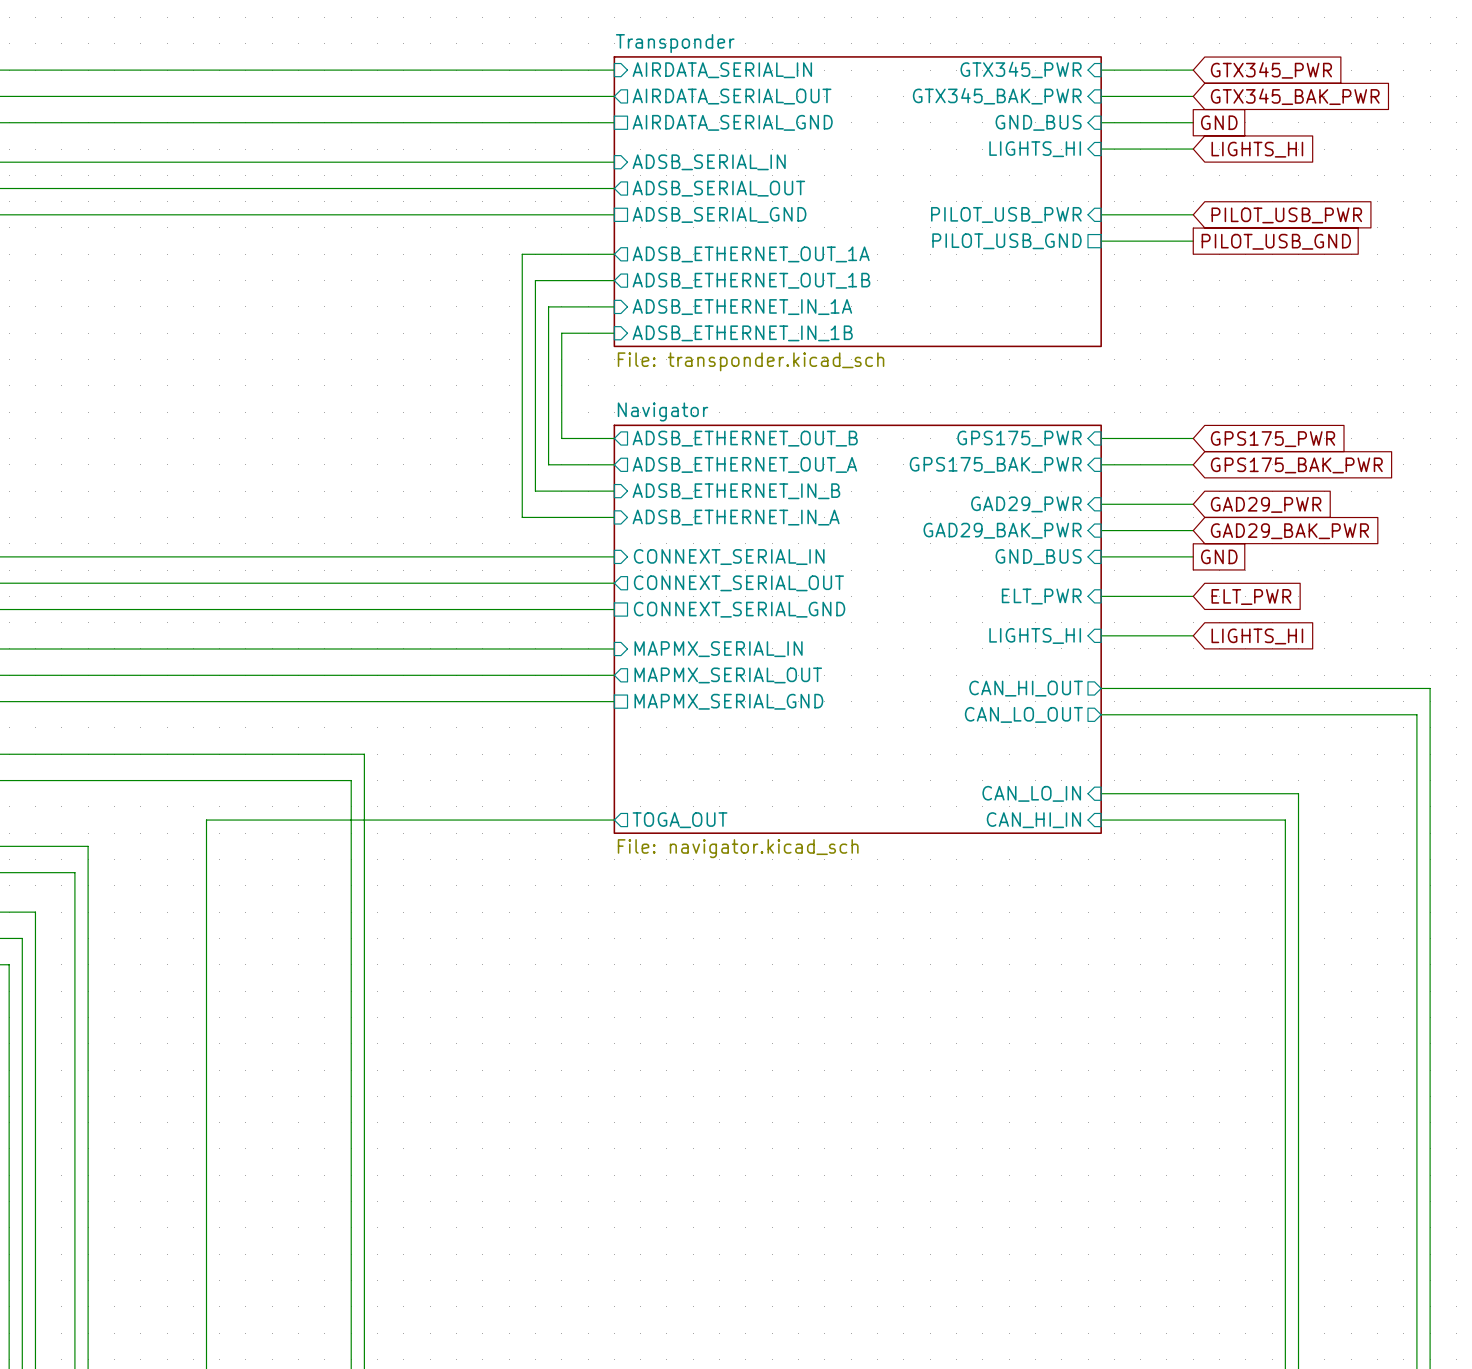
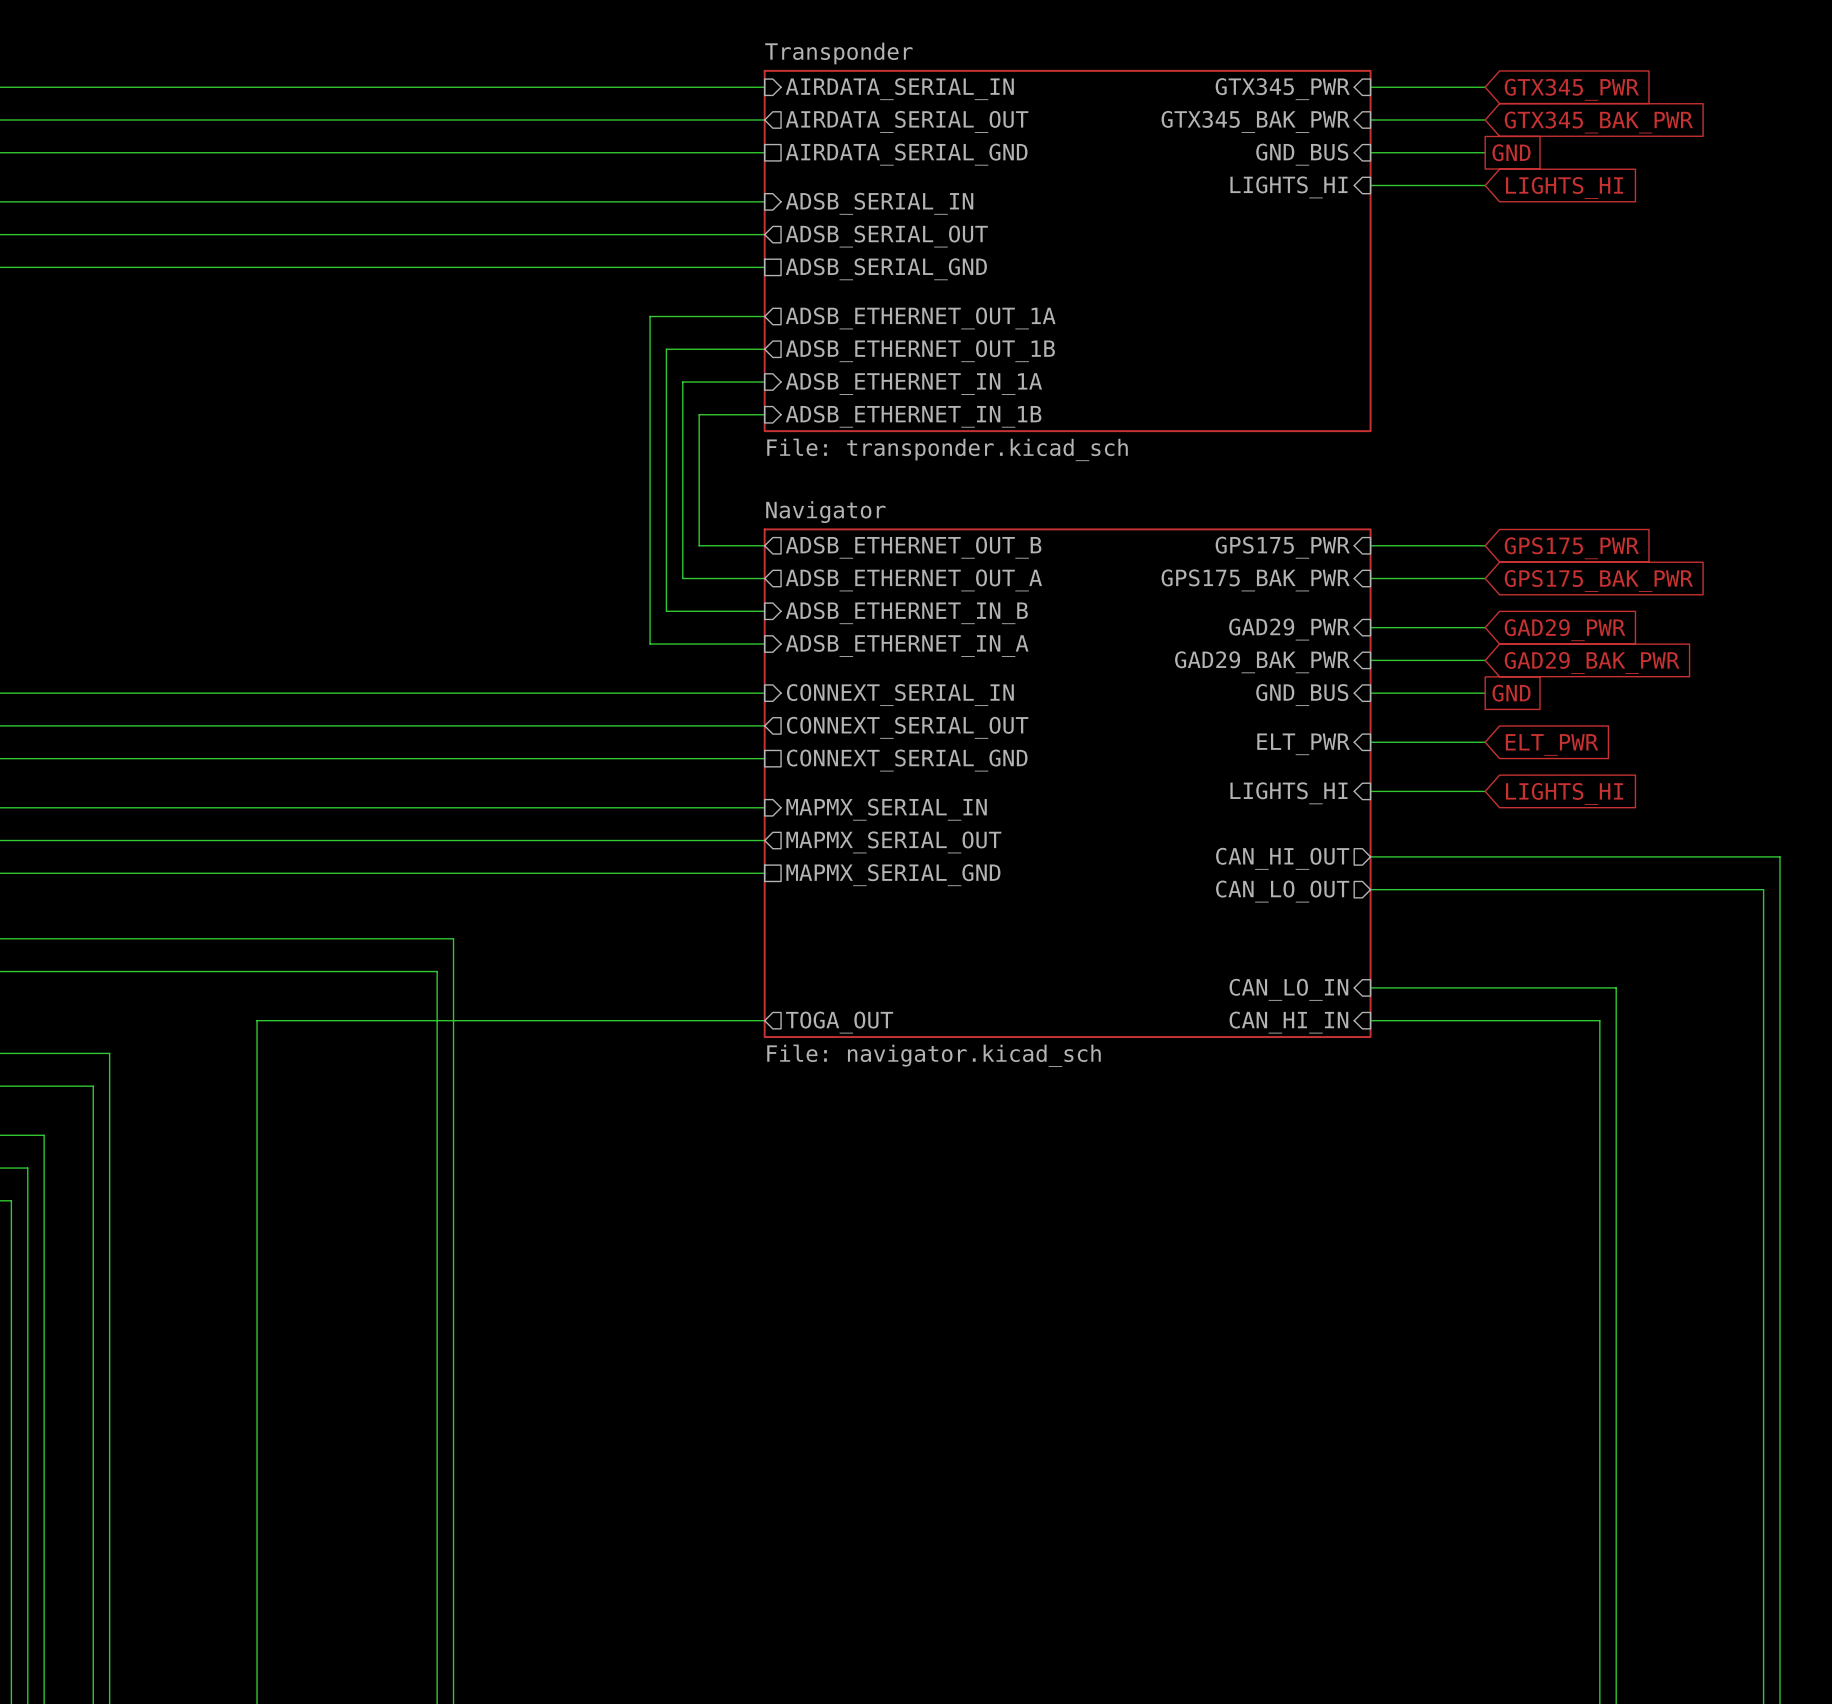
sheet pin: PILOT_USB_PWR (1006, 214) -> none
wire: (1101, 214) (1193, 214) -> none
global label: PILOT_USB_PWR (1286, 215) -> none
sheet pin: PILOT_USB_GND (1006, 241) -> none
wire: (1101, 241) (1193, 241) -> none
global label: PILOT_USB_GND (1276, 241) -> none

